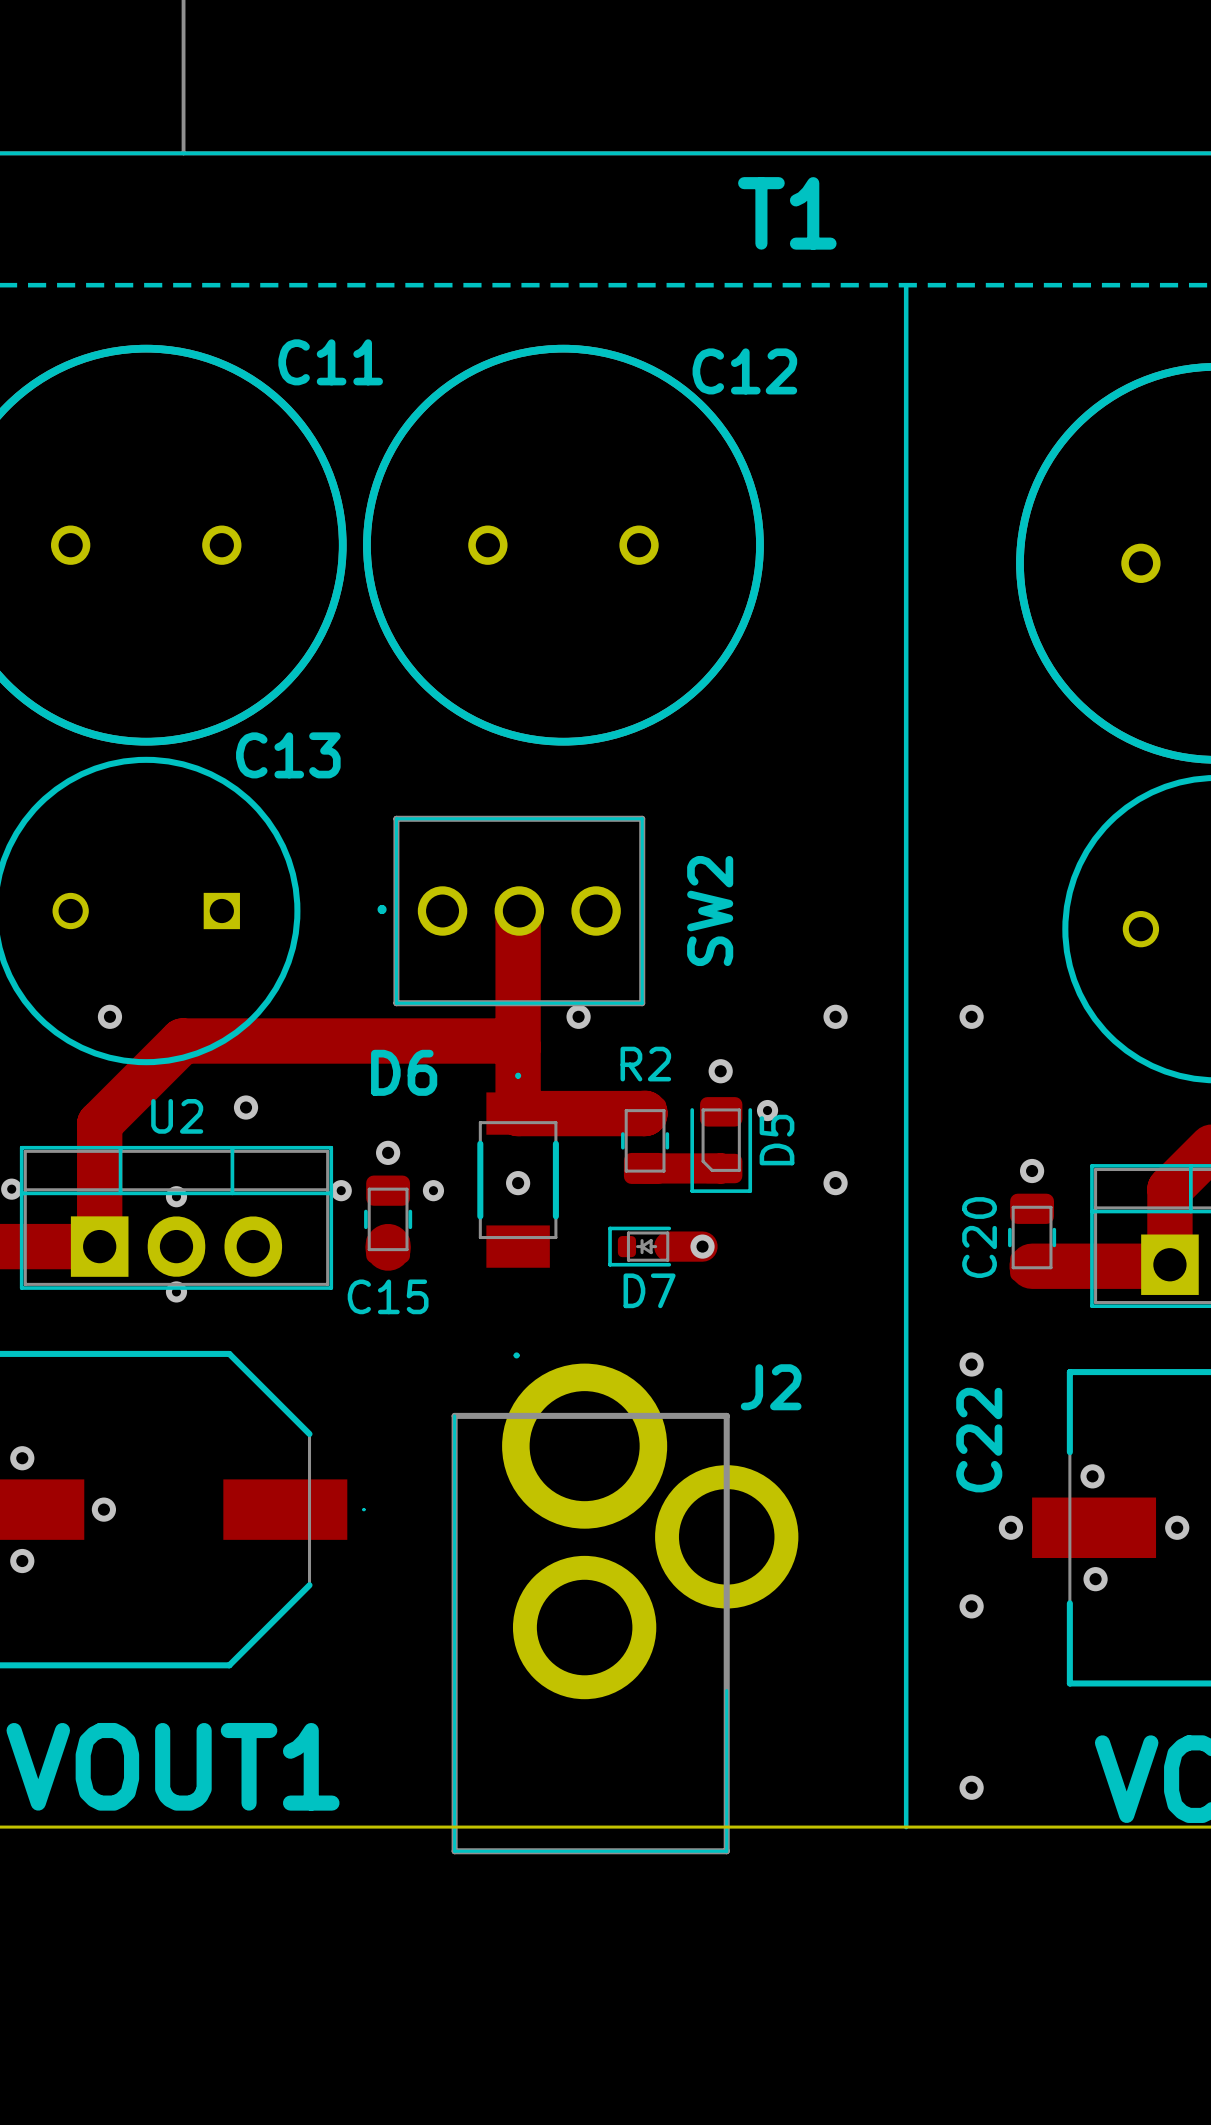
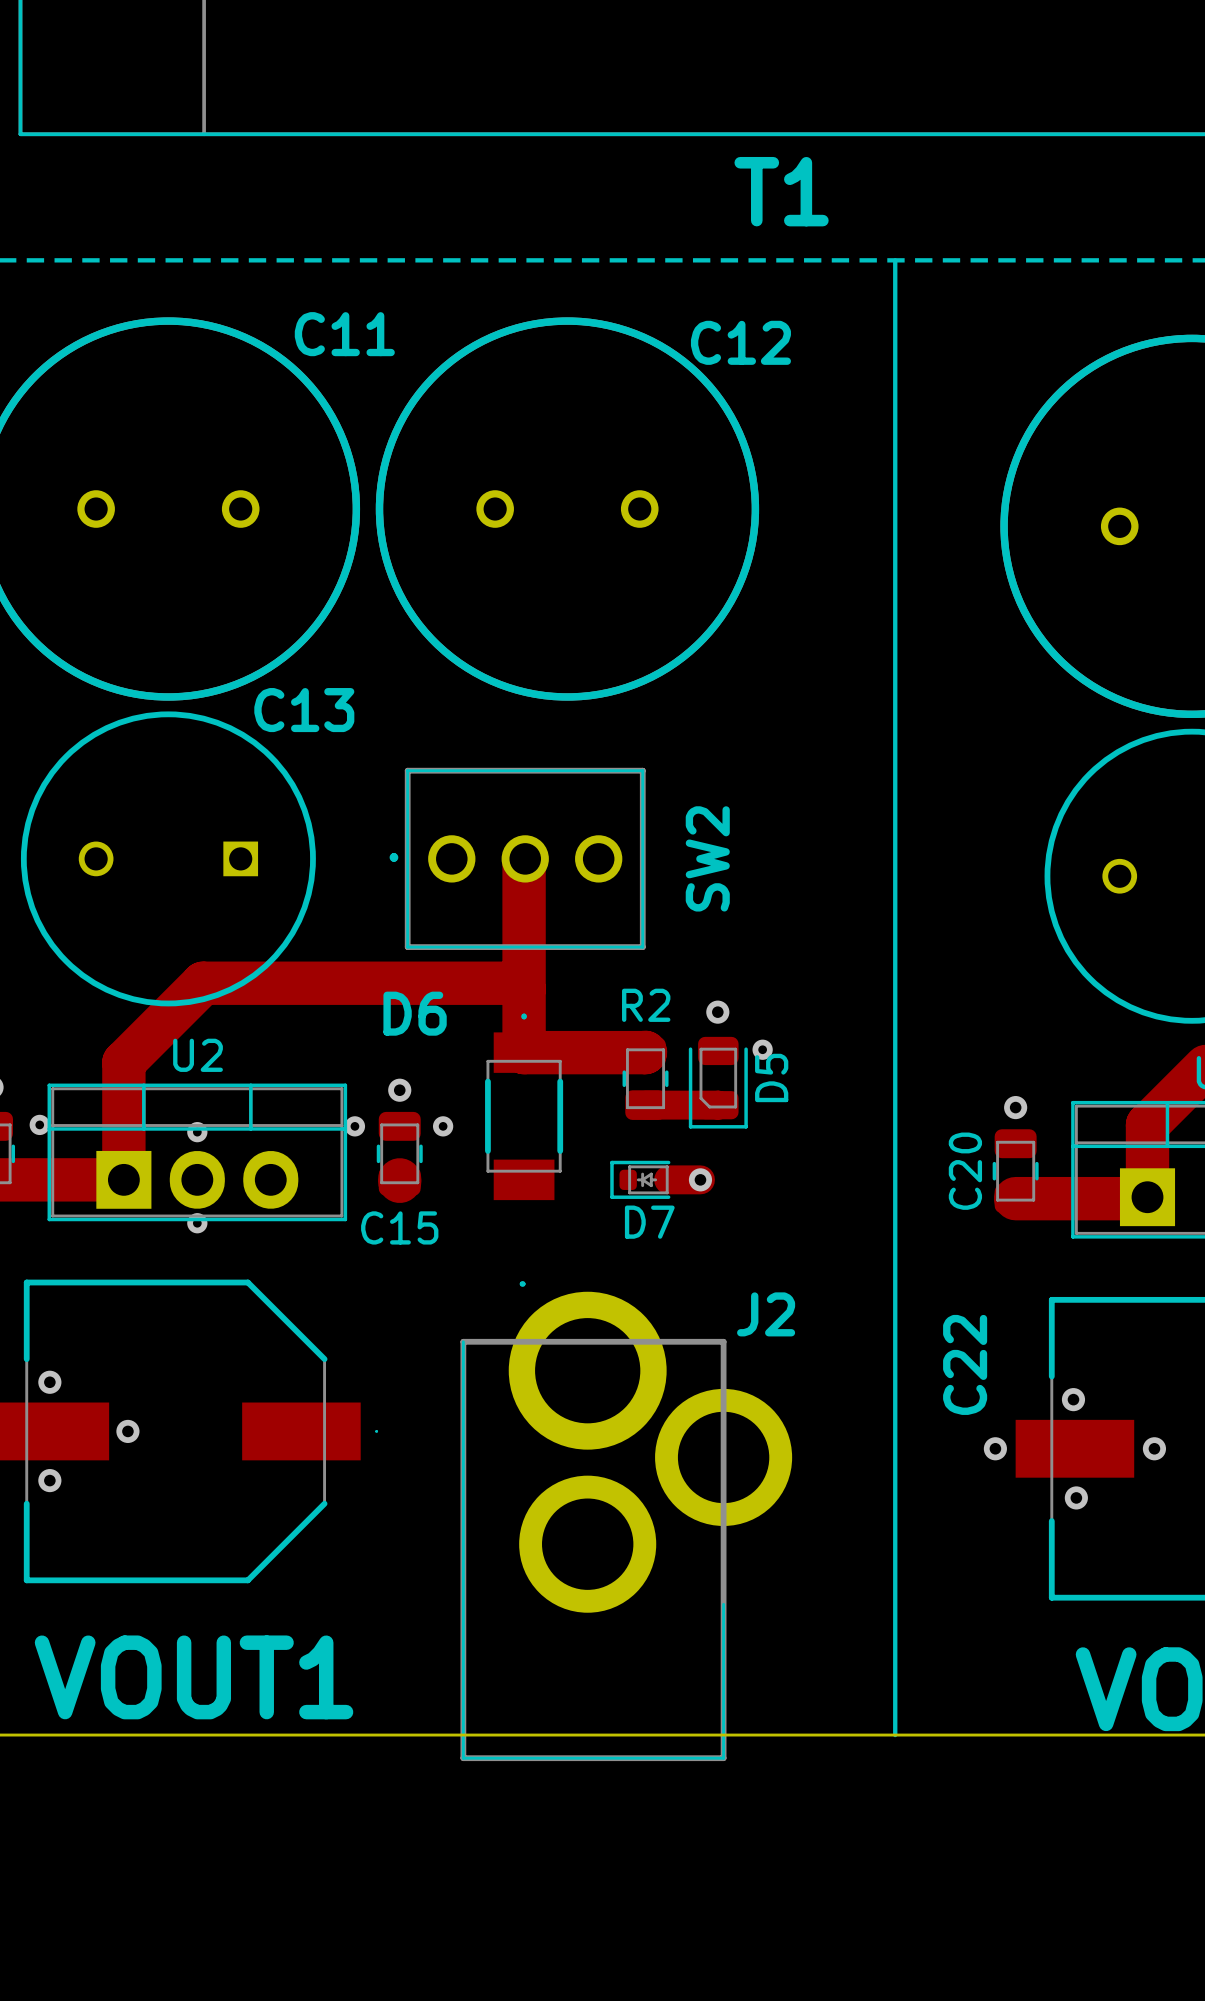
via: (109, 1016) -> none
via: (578, 1016) -> none
via: (835, 1016) -> none
via: (971, 1016) -> none
via: (246, 1107) -> none
via: (518, 1183) -> none
via: (835, 1183) -> none
via: (971, 1364) -> none
via: (971, 1606) -> none
via: (971, 1787) -> none

